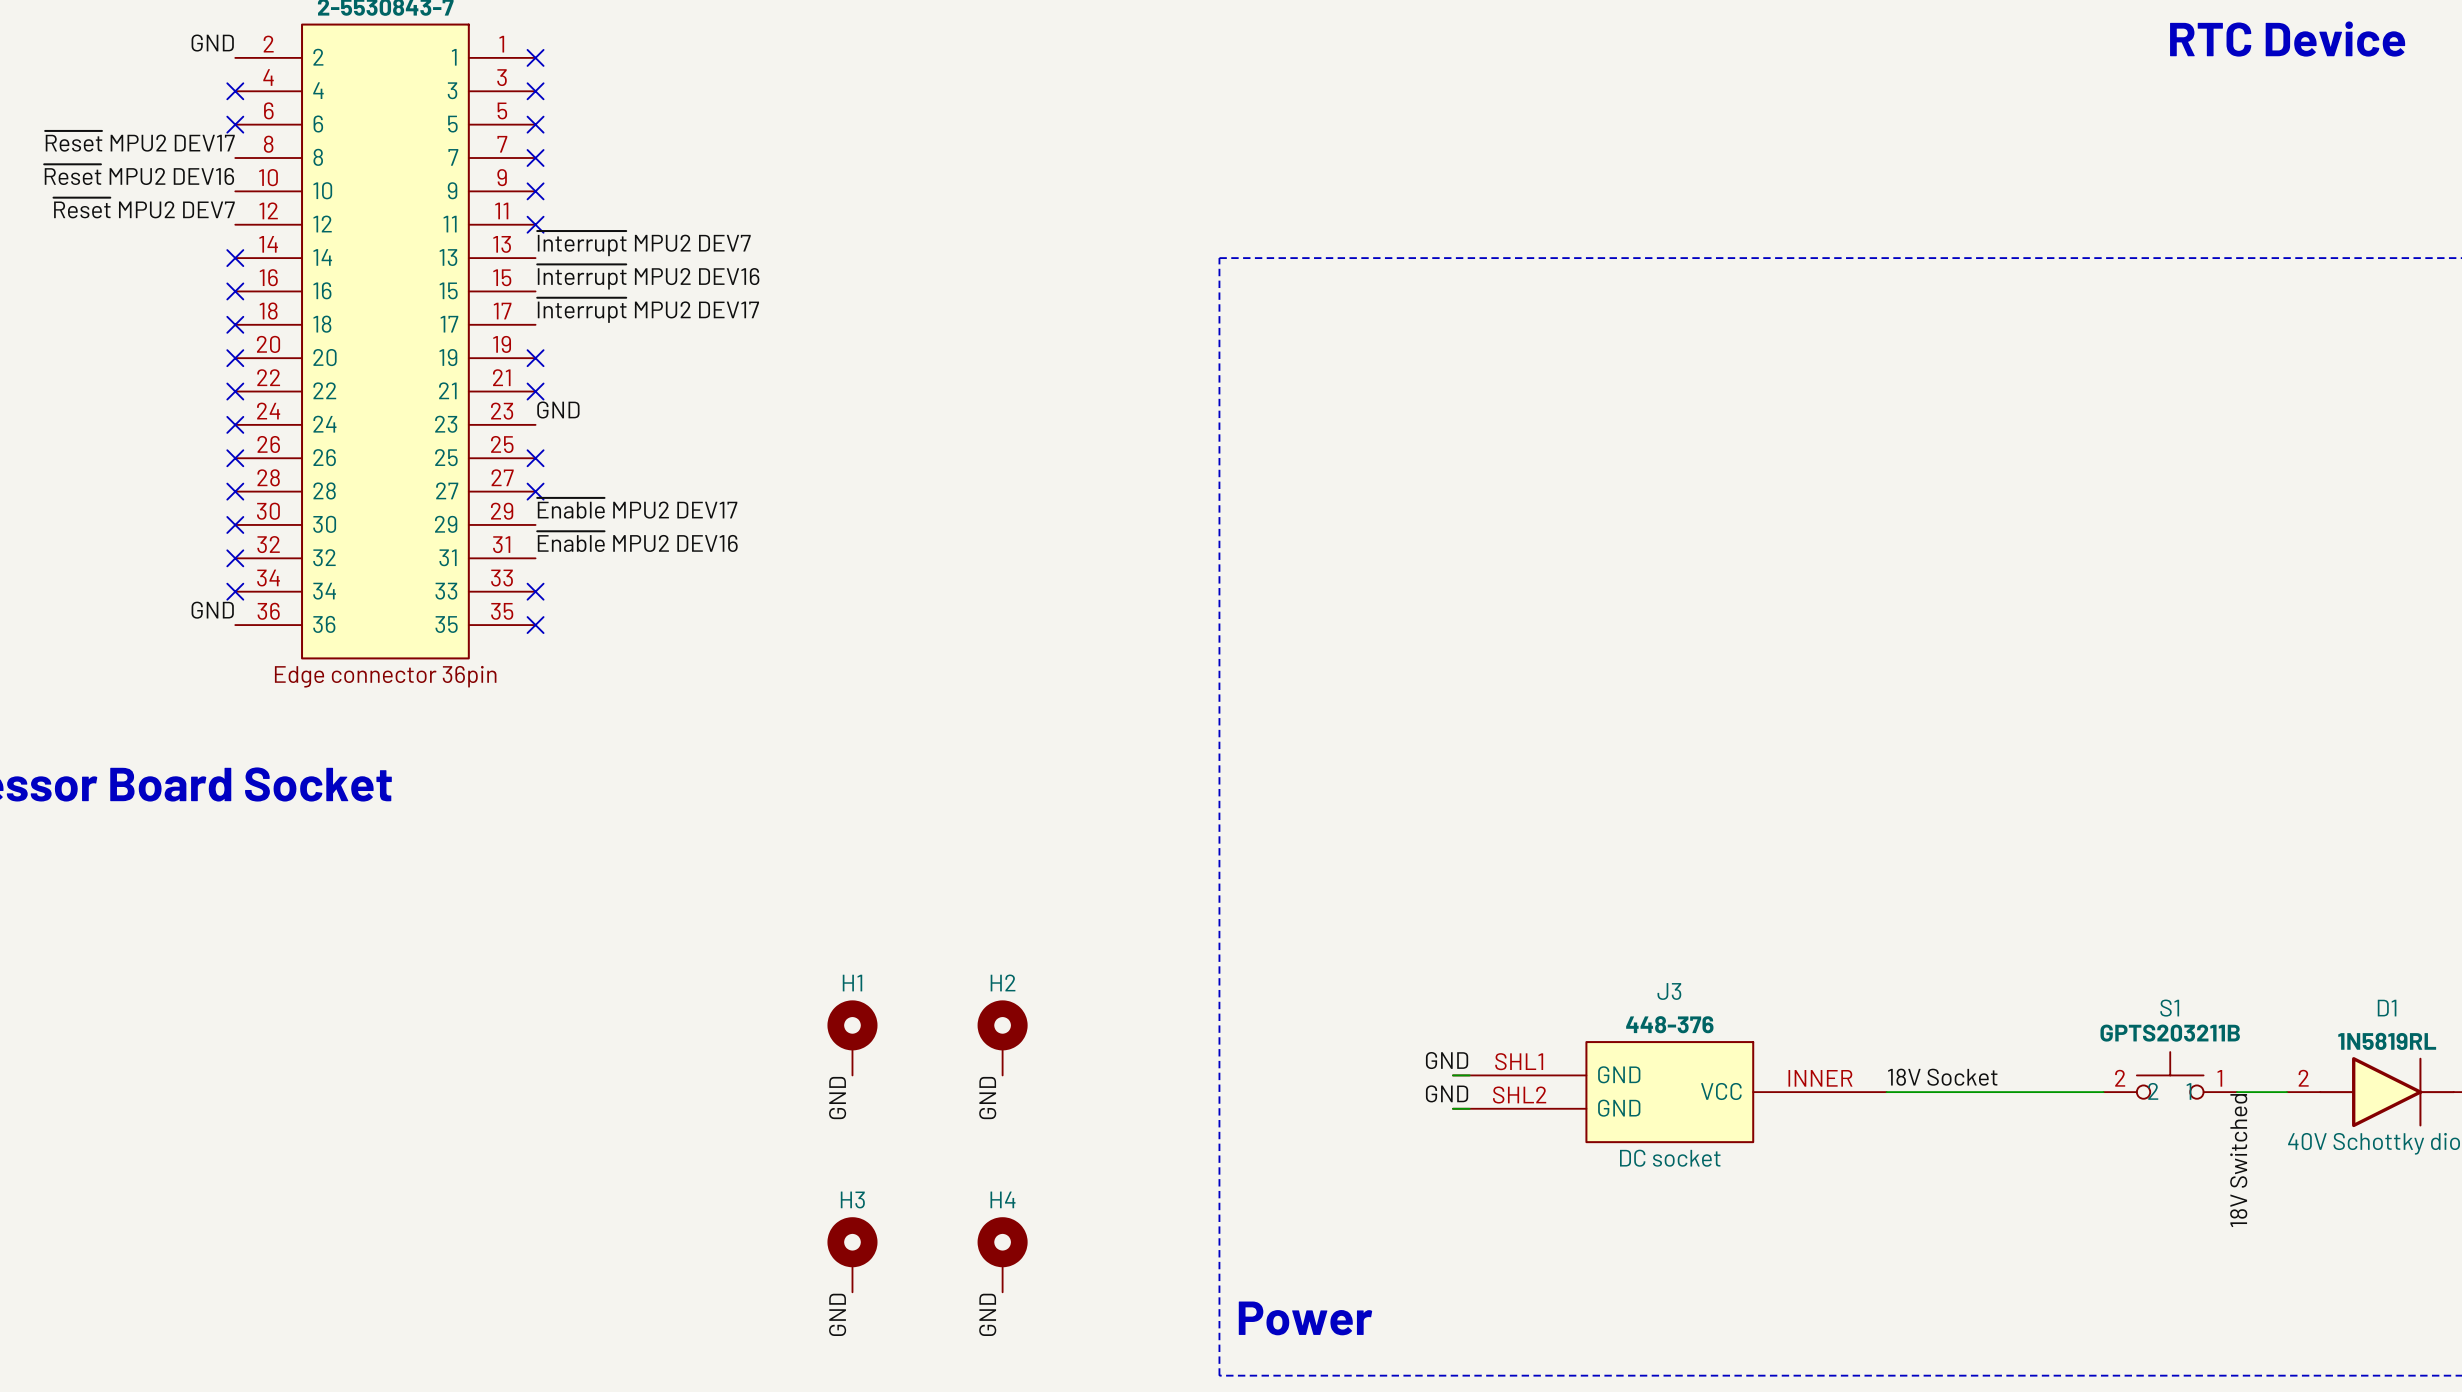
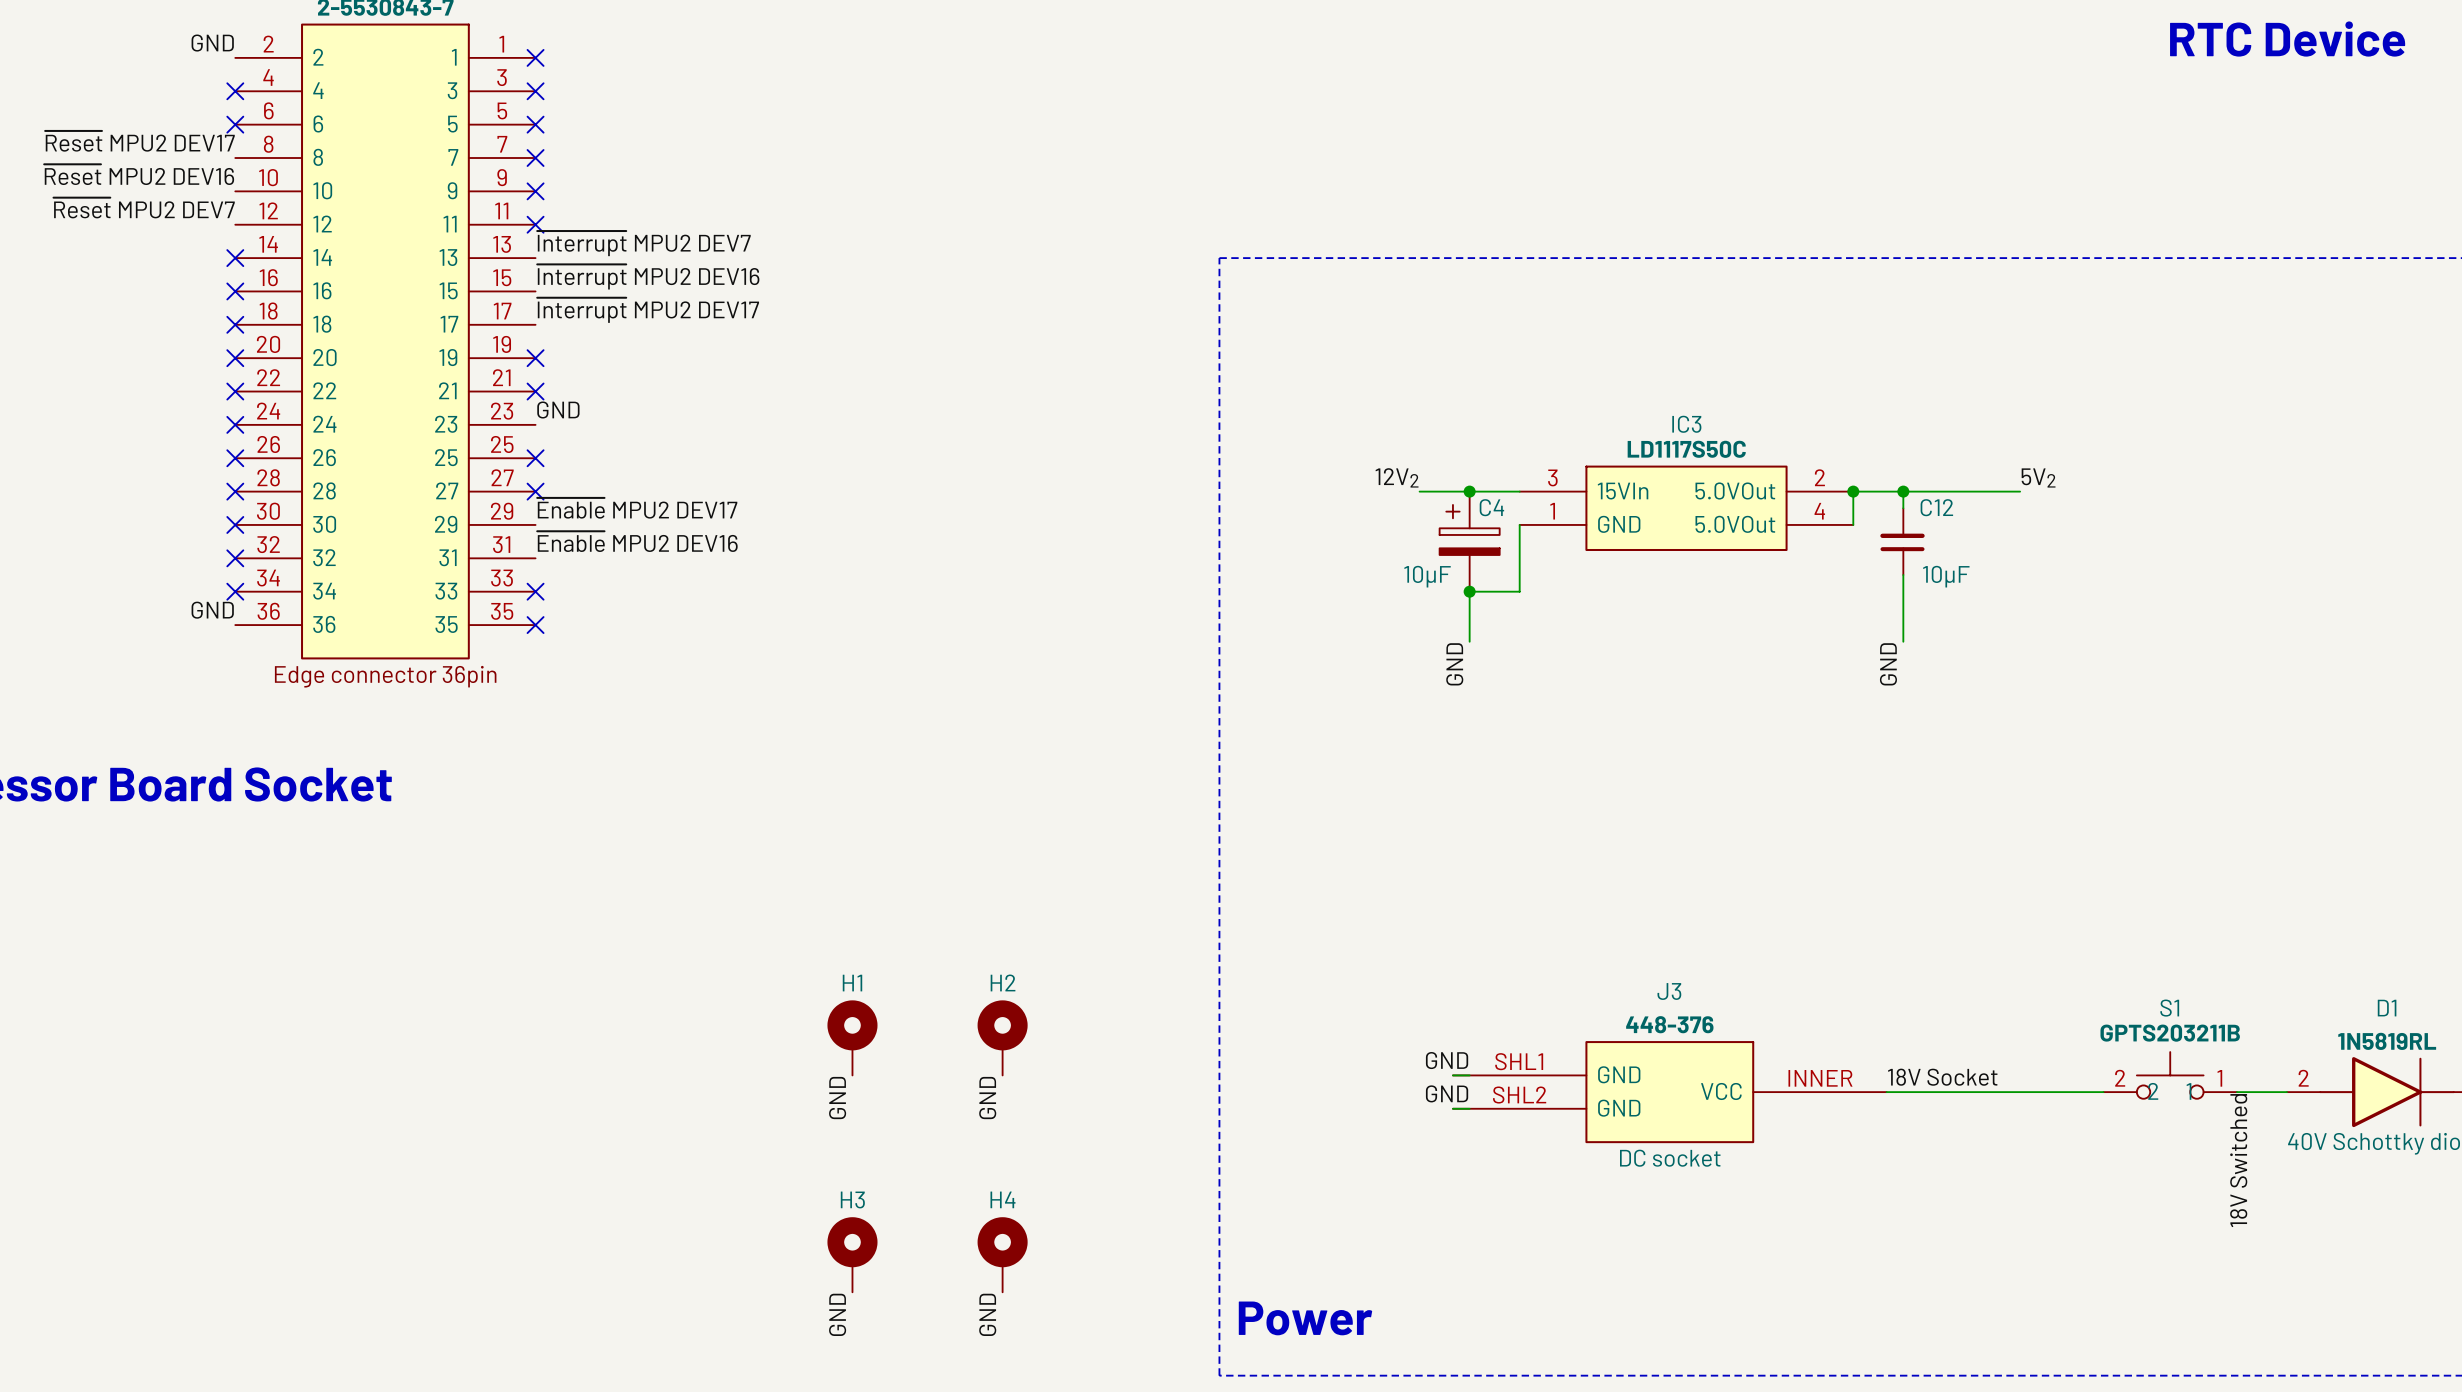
label: none -> 12V2 (1397, 477)
label: none -> 5V2 (2038, 477)
wire: none -> (1419, 491) (1519, 491)
junction: none -> (1469, 491)
junction: none -> (1853, 491)
wire: none -> (1903, 491) (1903, 508)
junction: none -> (1903, 491)
wire: none -> (2020, 491) (1853, 491) (1853, 524)
IC3: none -> LD1117S50C (1686, 508)
wire: none -> (1519, 524) (1519, 591) (1469, 591) (1469, 641)
C4: none -> 10μF (1469, 541)
C12: none -> 10µF (1902, 541)
wire: none -> (1903, 575) (1903, 641)
junction: none -> (1469, 591)
label: none -> GND (1454, 664)
label: none -> GND (1888, 664)

